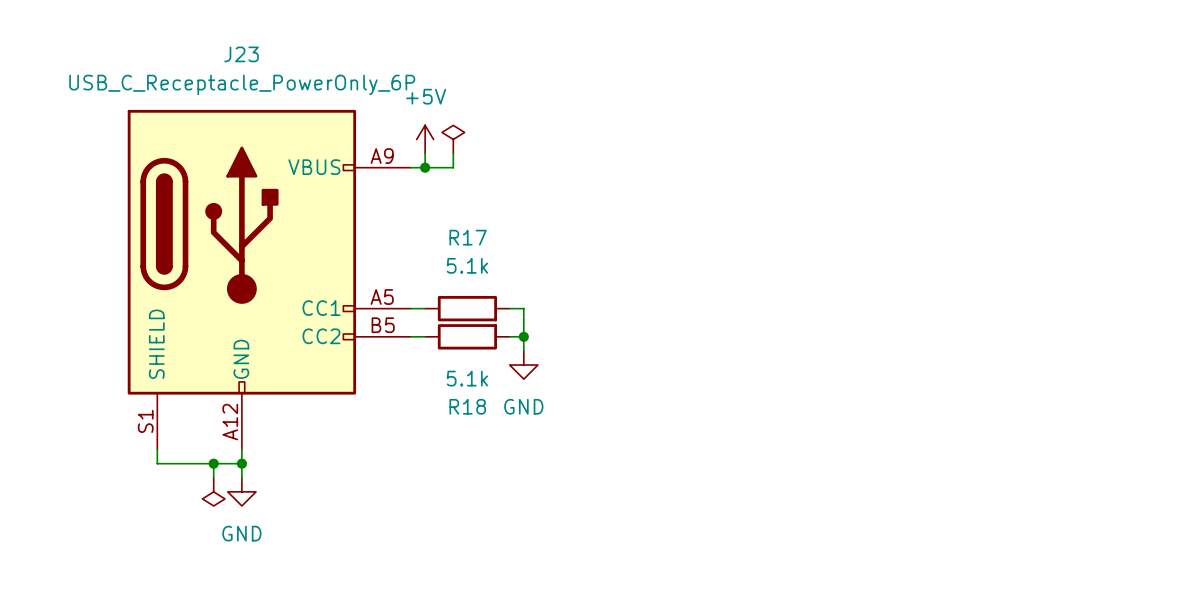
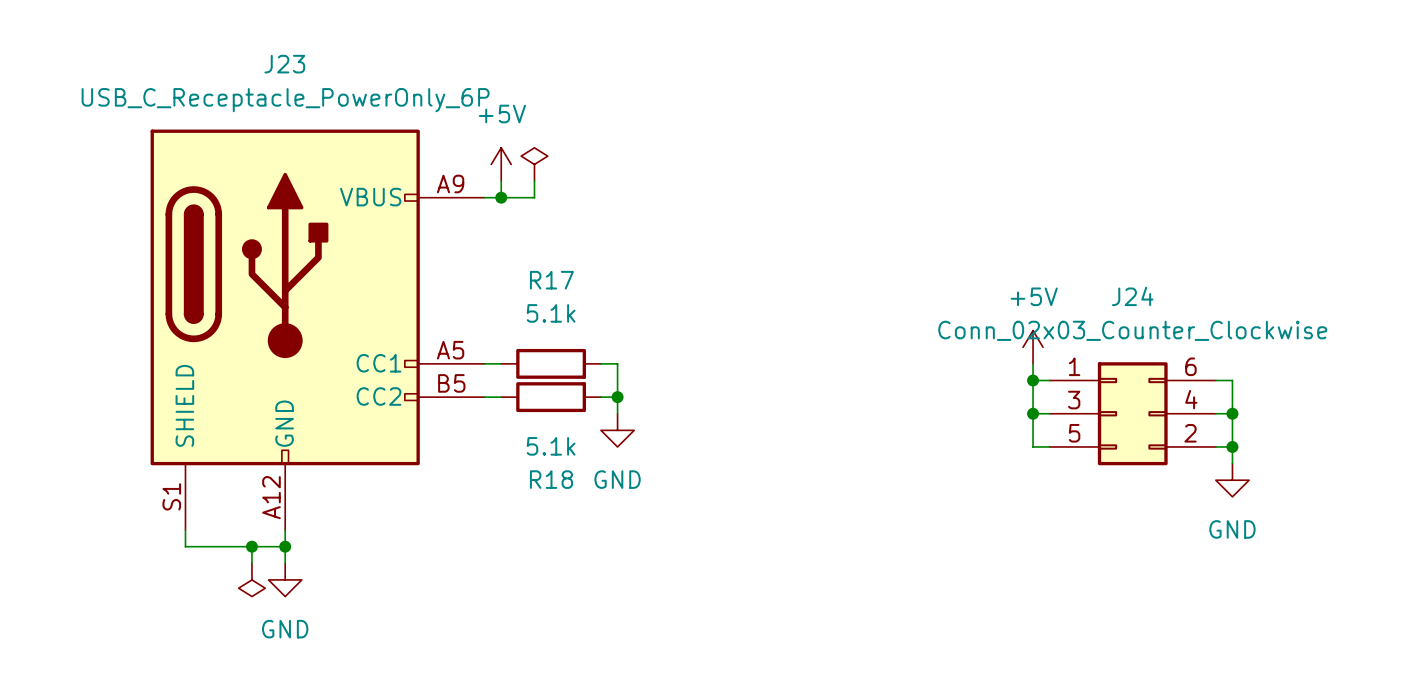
power symbol: none -> +5V (1033, 347)
wire: none -> (1033, 363) (1033, 446) (1049, 446)
wire: none -> (1033, 380) (1049, 380)
junction: none -> (1033, 380)
wire: none -> (1215, 380) (1232, 380) (1232, 463)
wire: none -> (1033, 413) (1049, 413)
junction: none -> (1033, 413)
J24: none -> Conn_02x03_Counter_Clockwise (1132, 413)
wire: none -> (1215, 413) (1232, 413)
junction: none -> (1232, 413)
wire: none -> (1215, 446) (1232, 446)
junction: none -> (1232, 446)
power symbol: none -> GND (1232, 480)

